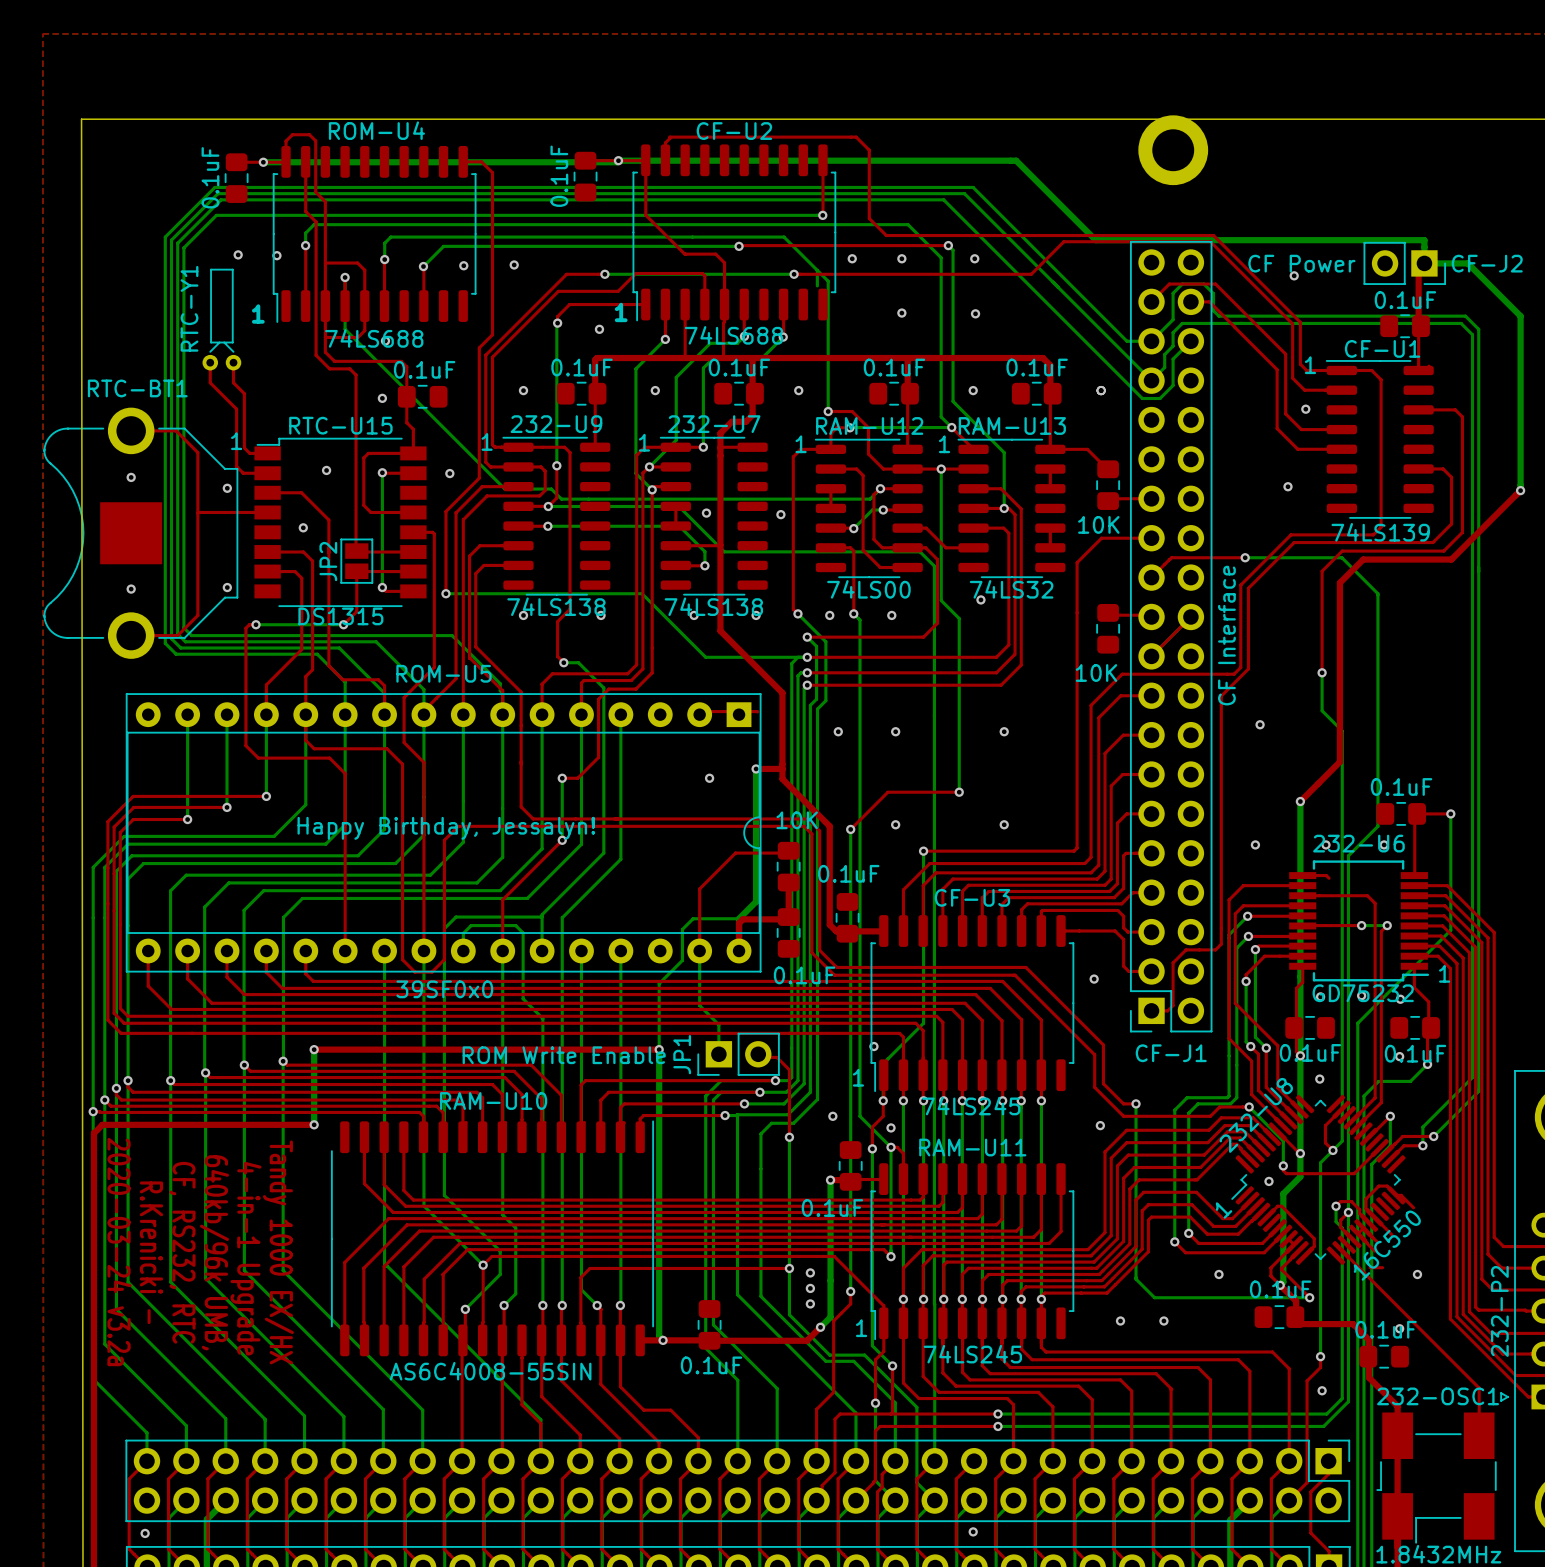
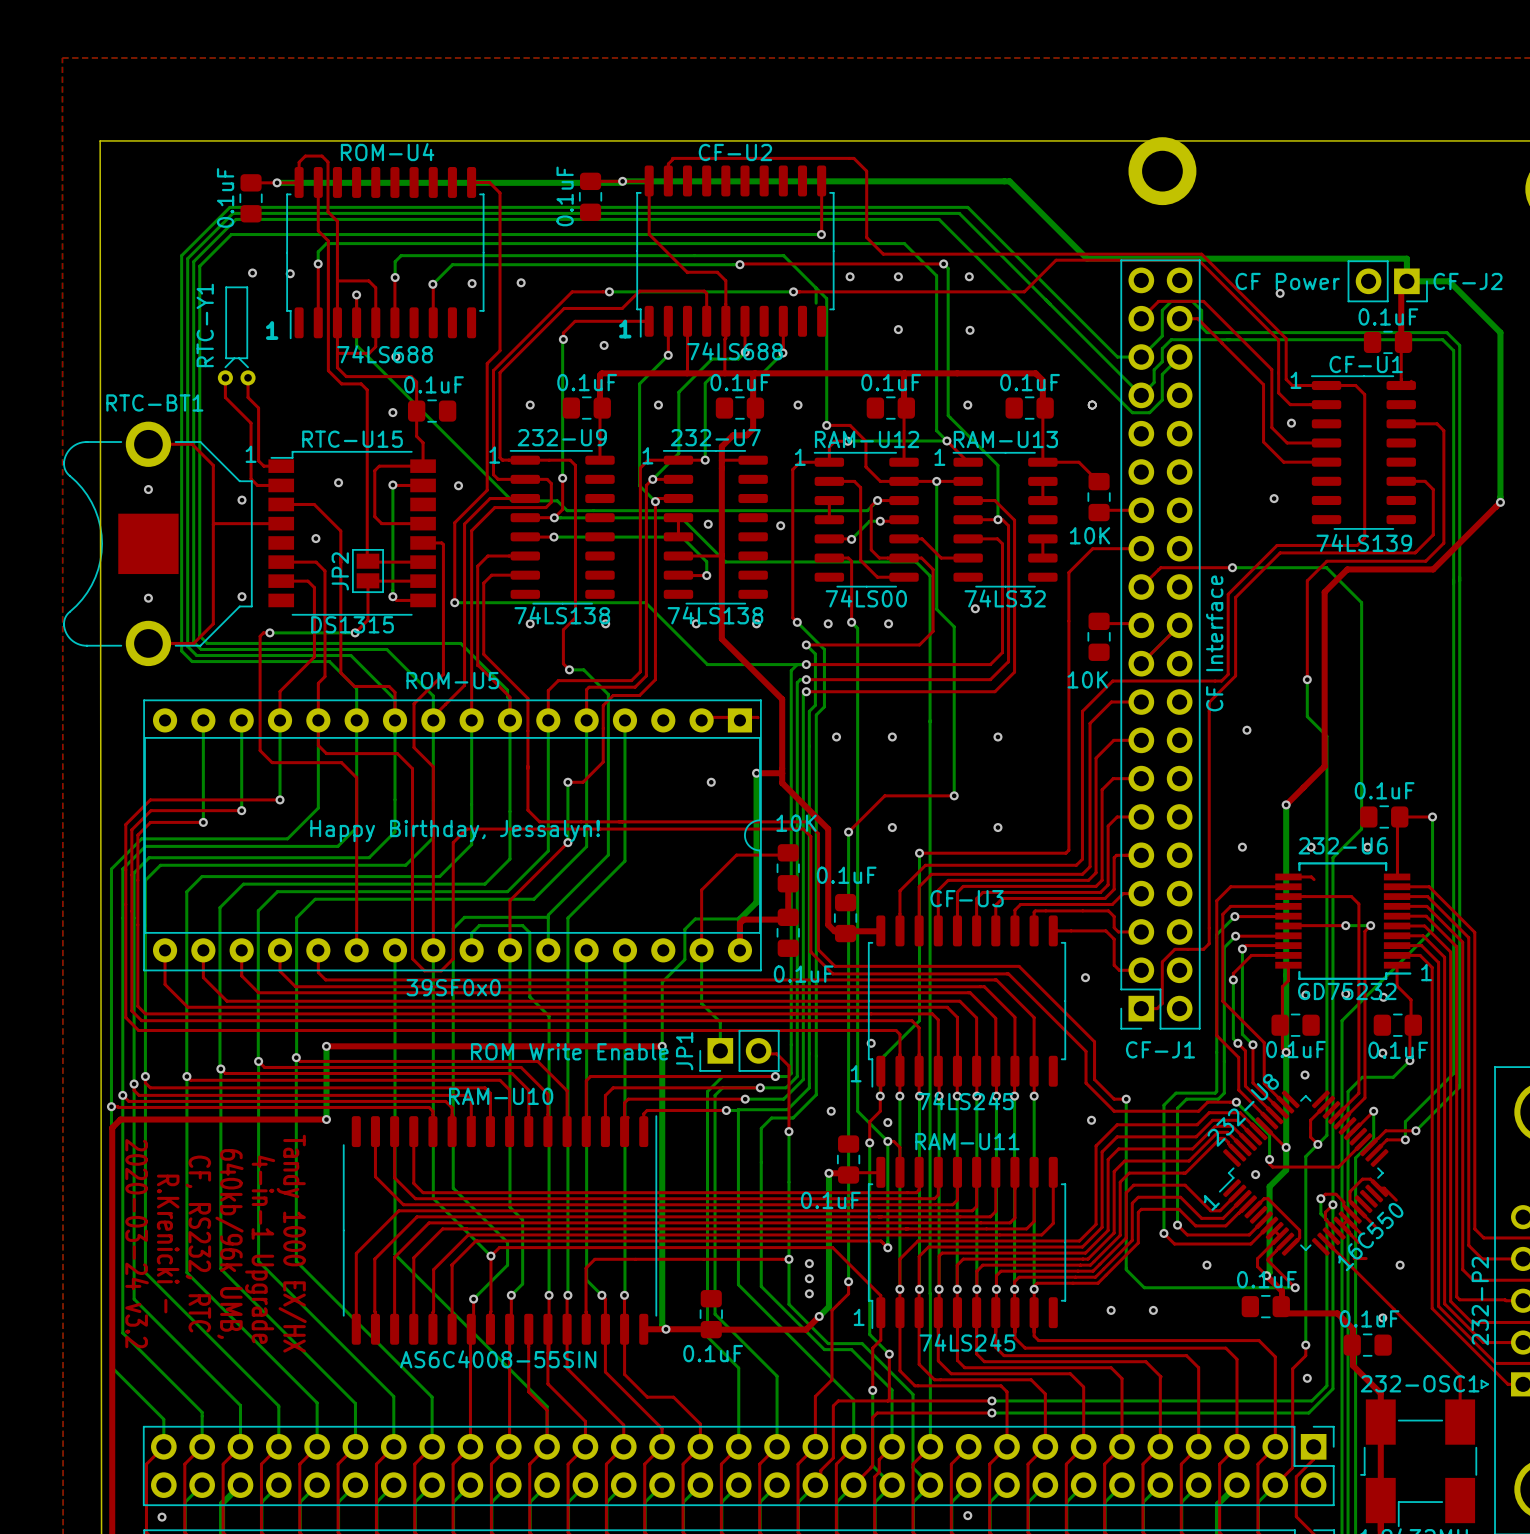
text: 2020-03-24 v3.2a (119, 1252) -> 2020-03-24 v3.2 (137, 1243)

